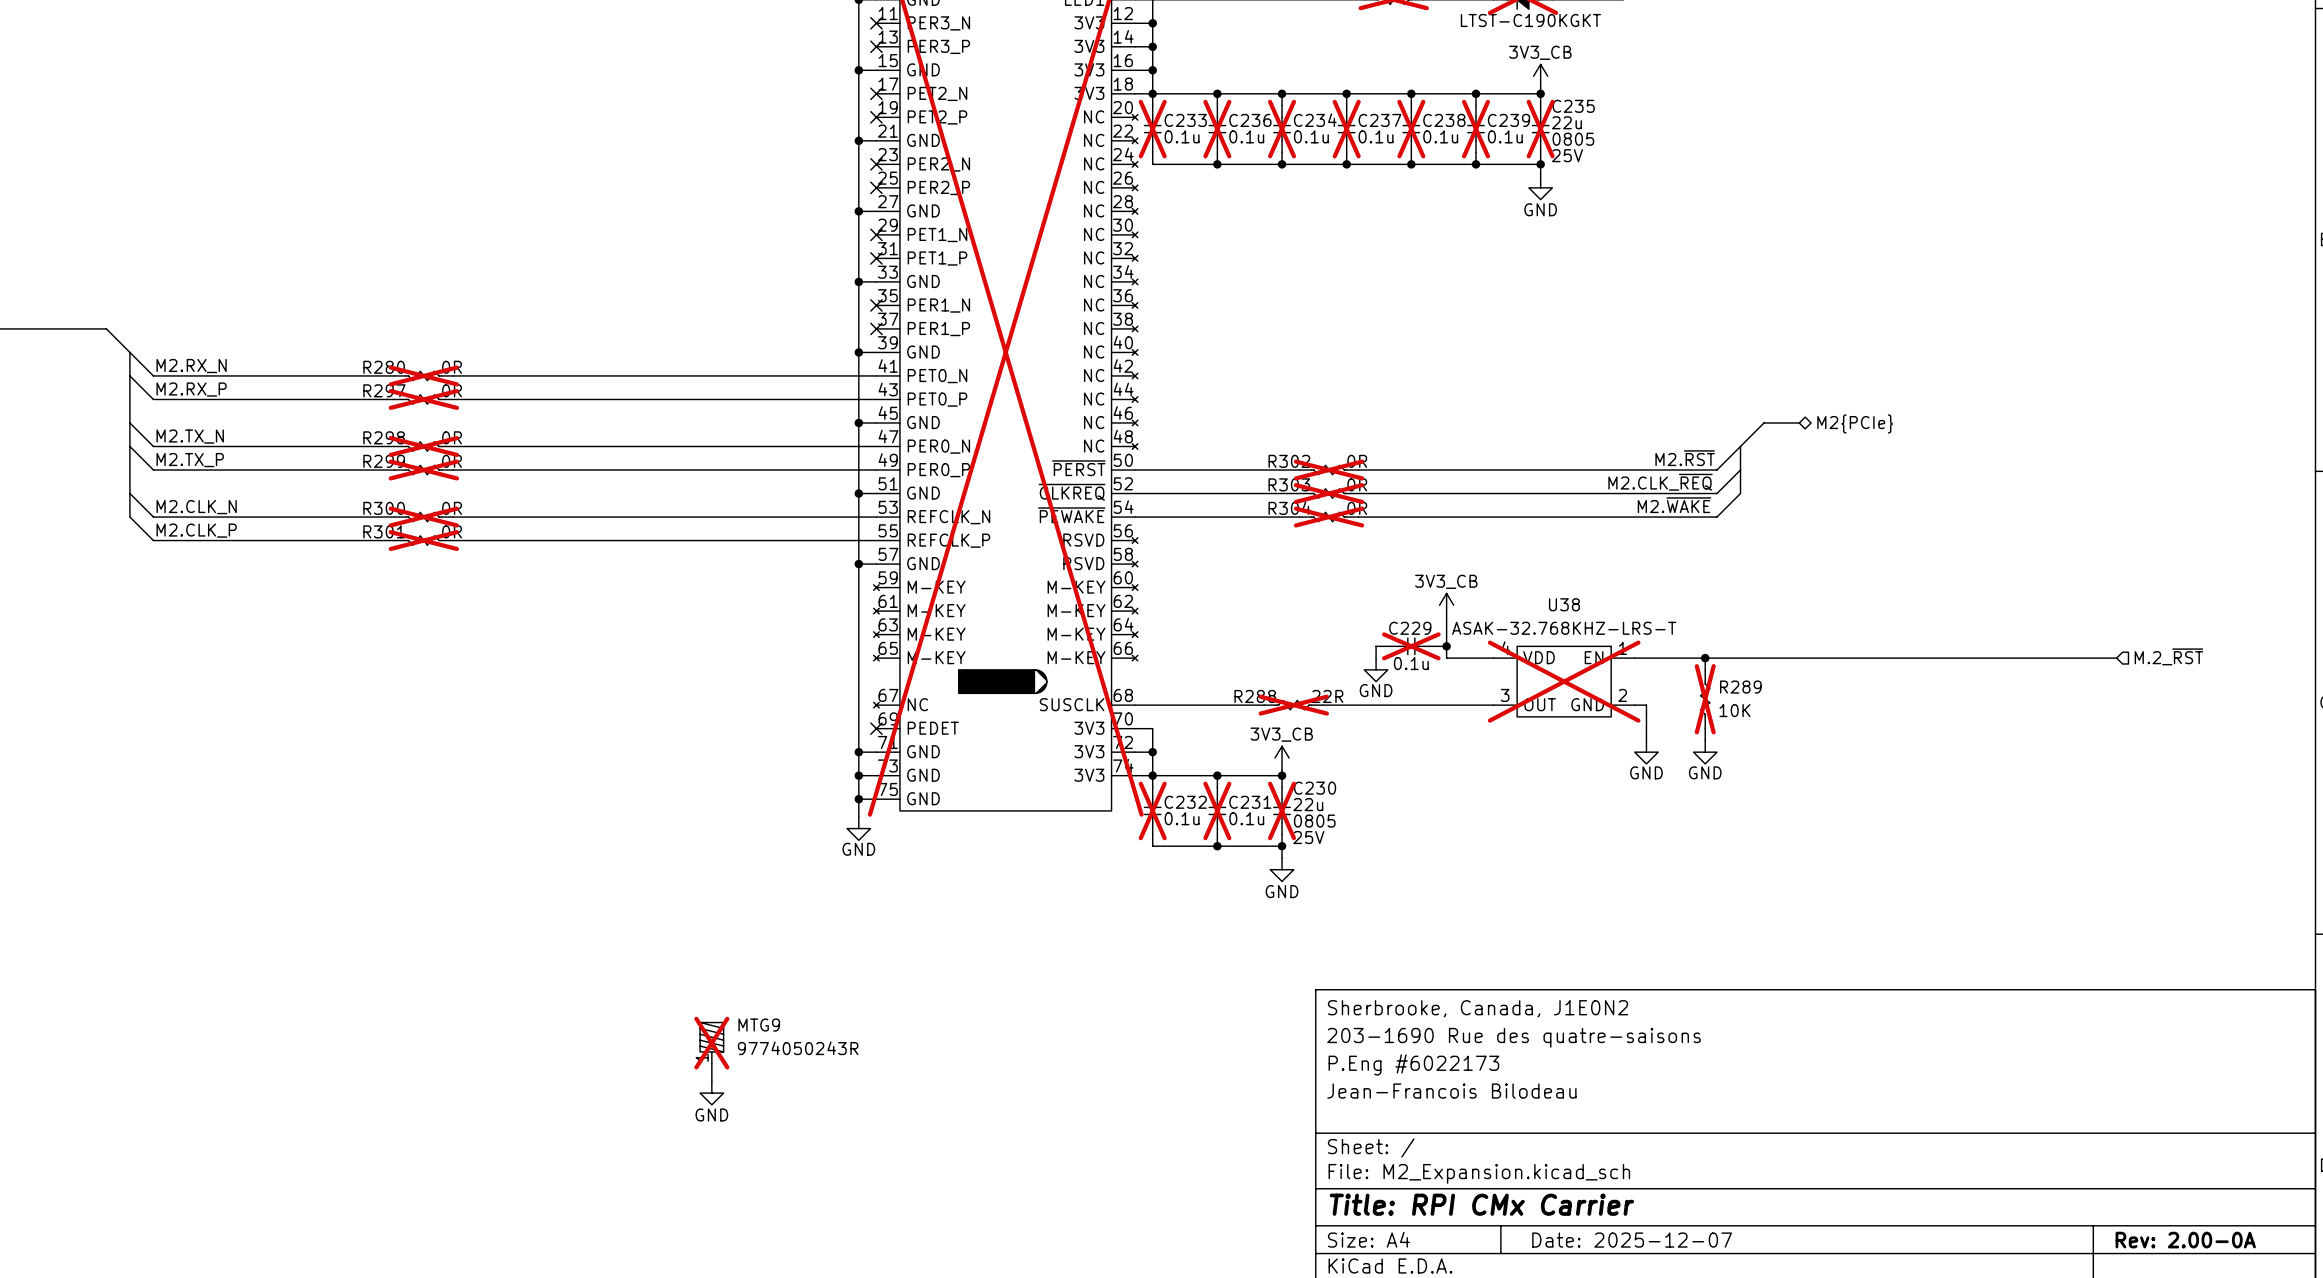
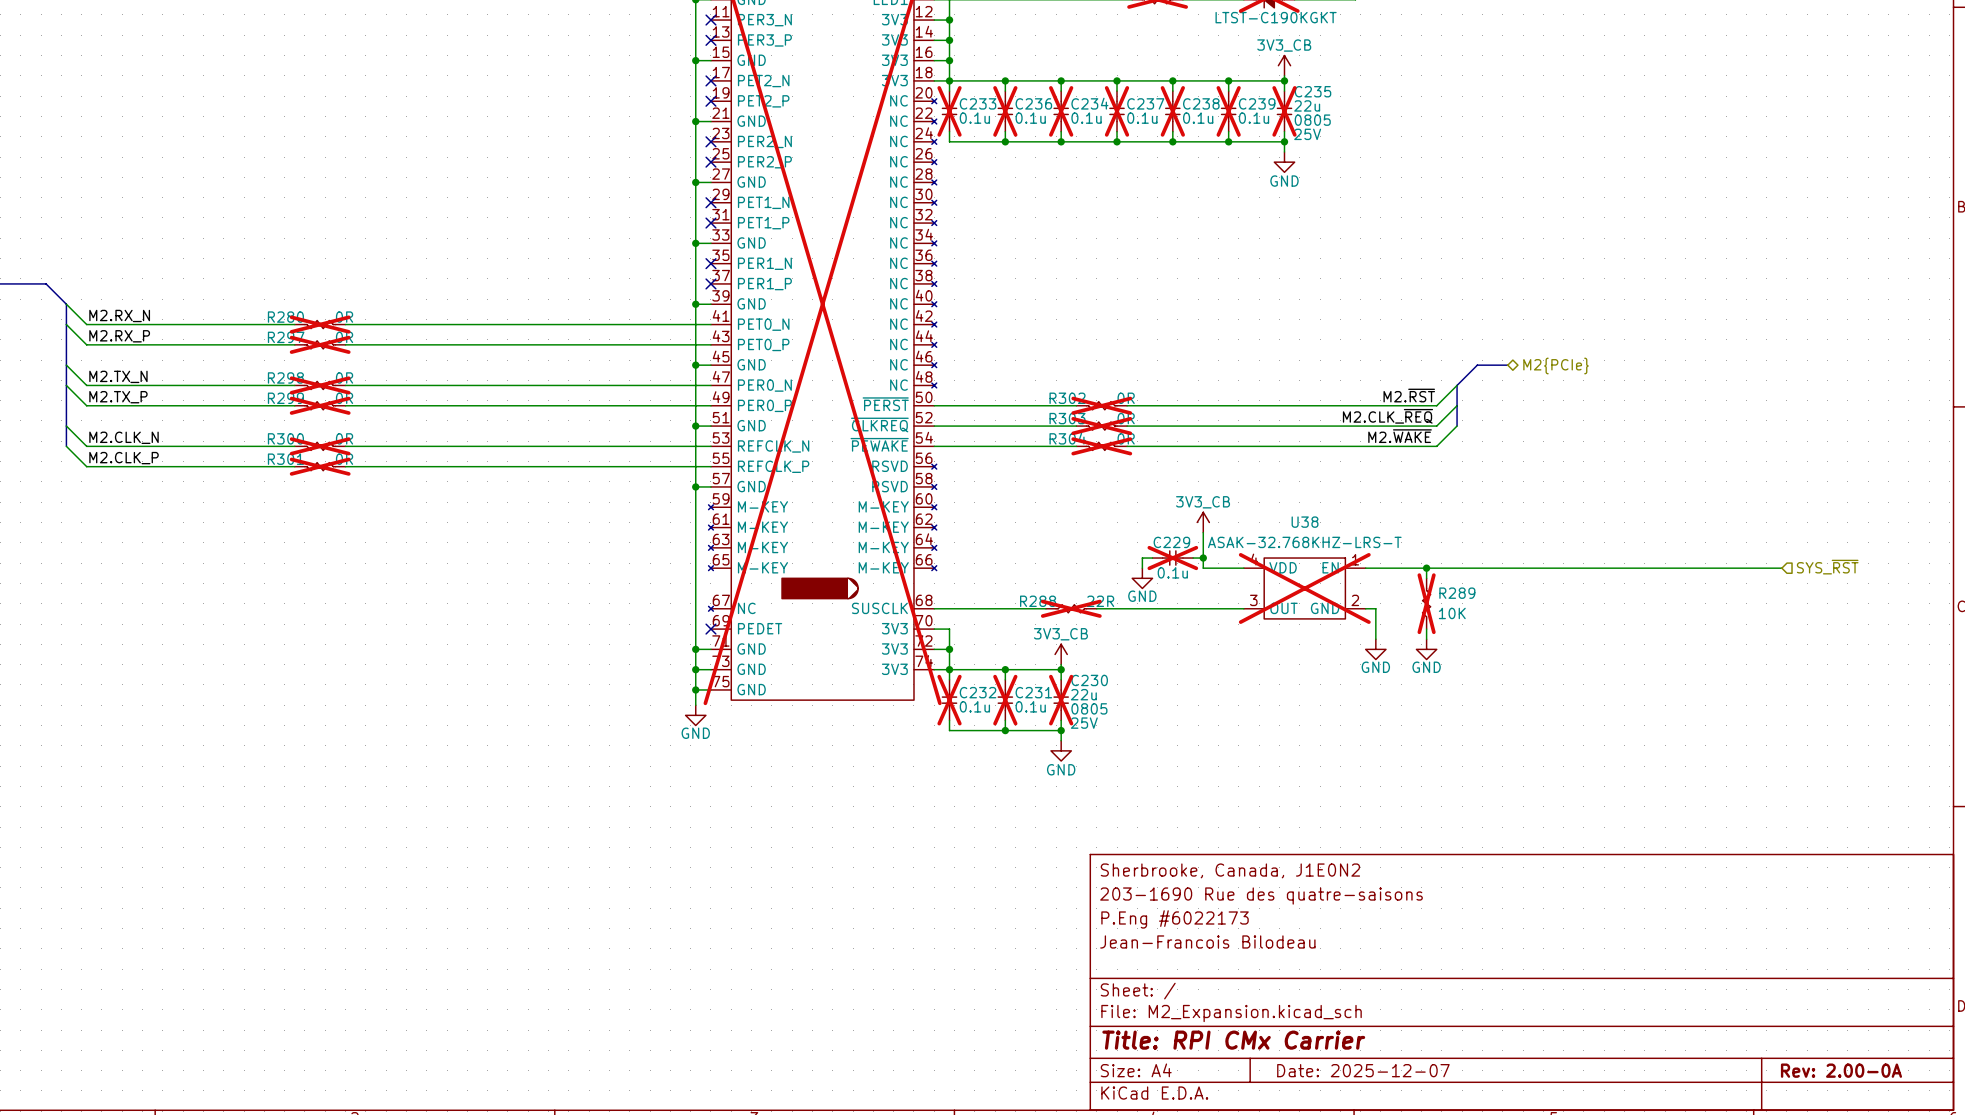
hierarchical label: M.2_~{RST} (2168, 656) -> SYS_~{RST} (1827, 567)
MTG9: 9774050243R (711, 1043) -> none
wire: (711, 1063) (711, 1081) -> none
power symbol: GND (711, 1093) -> none

